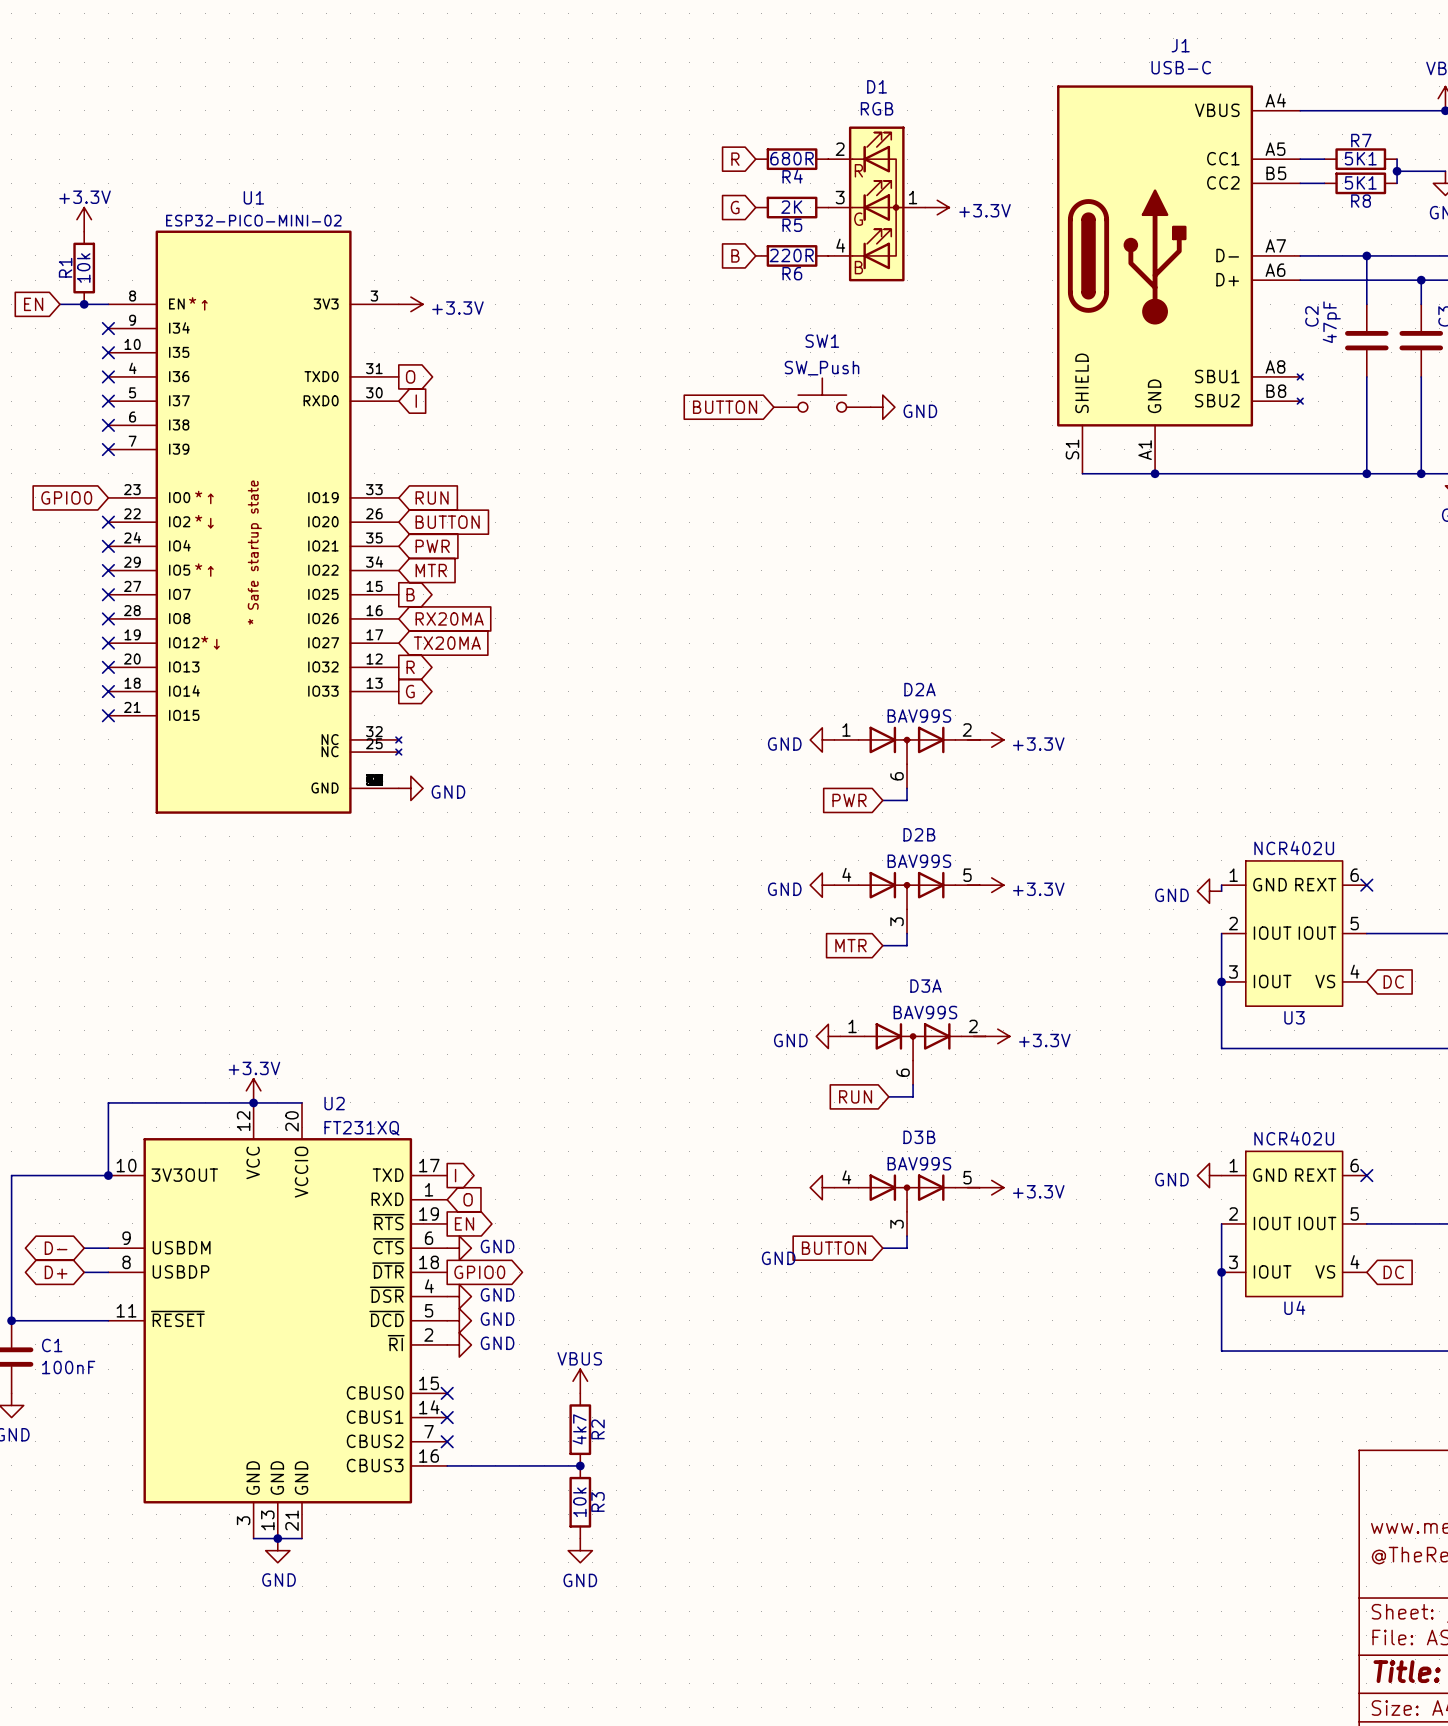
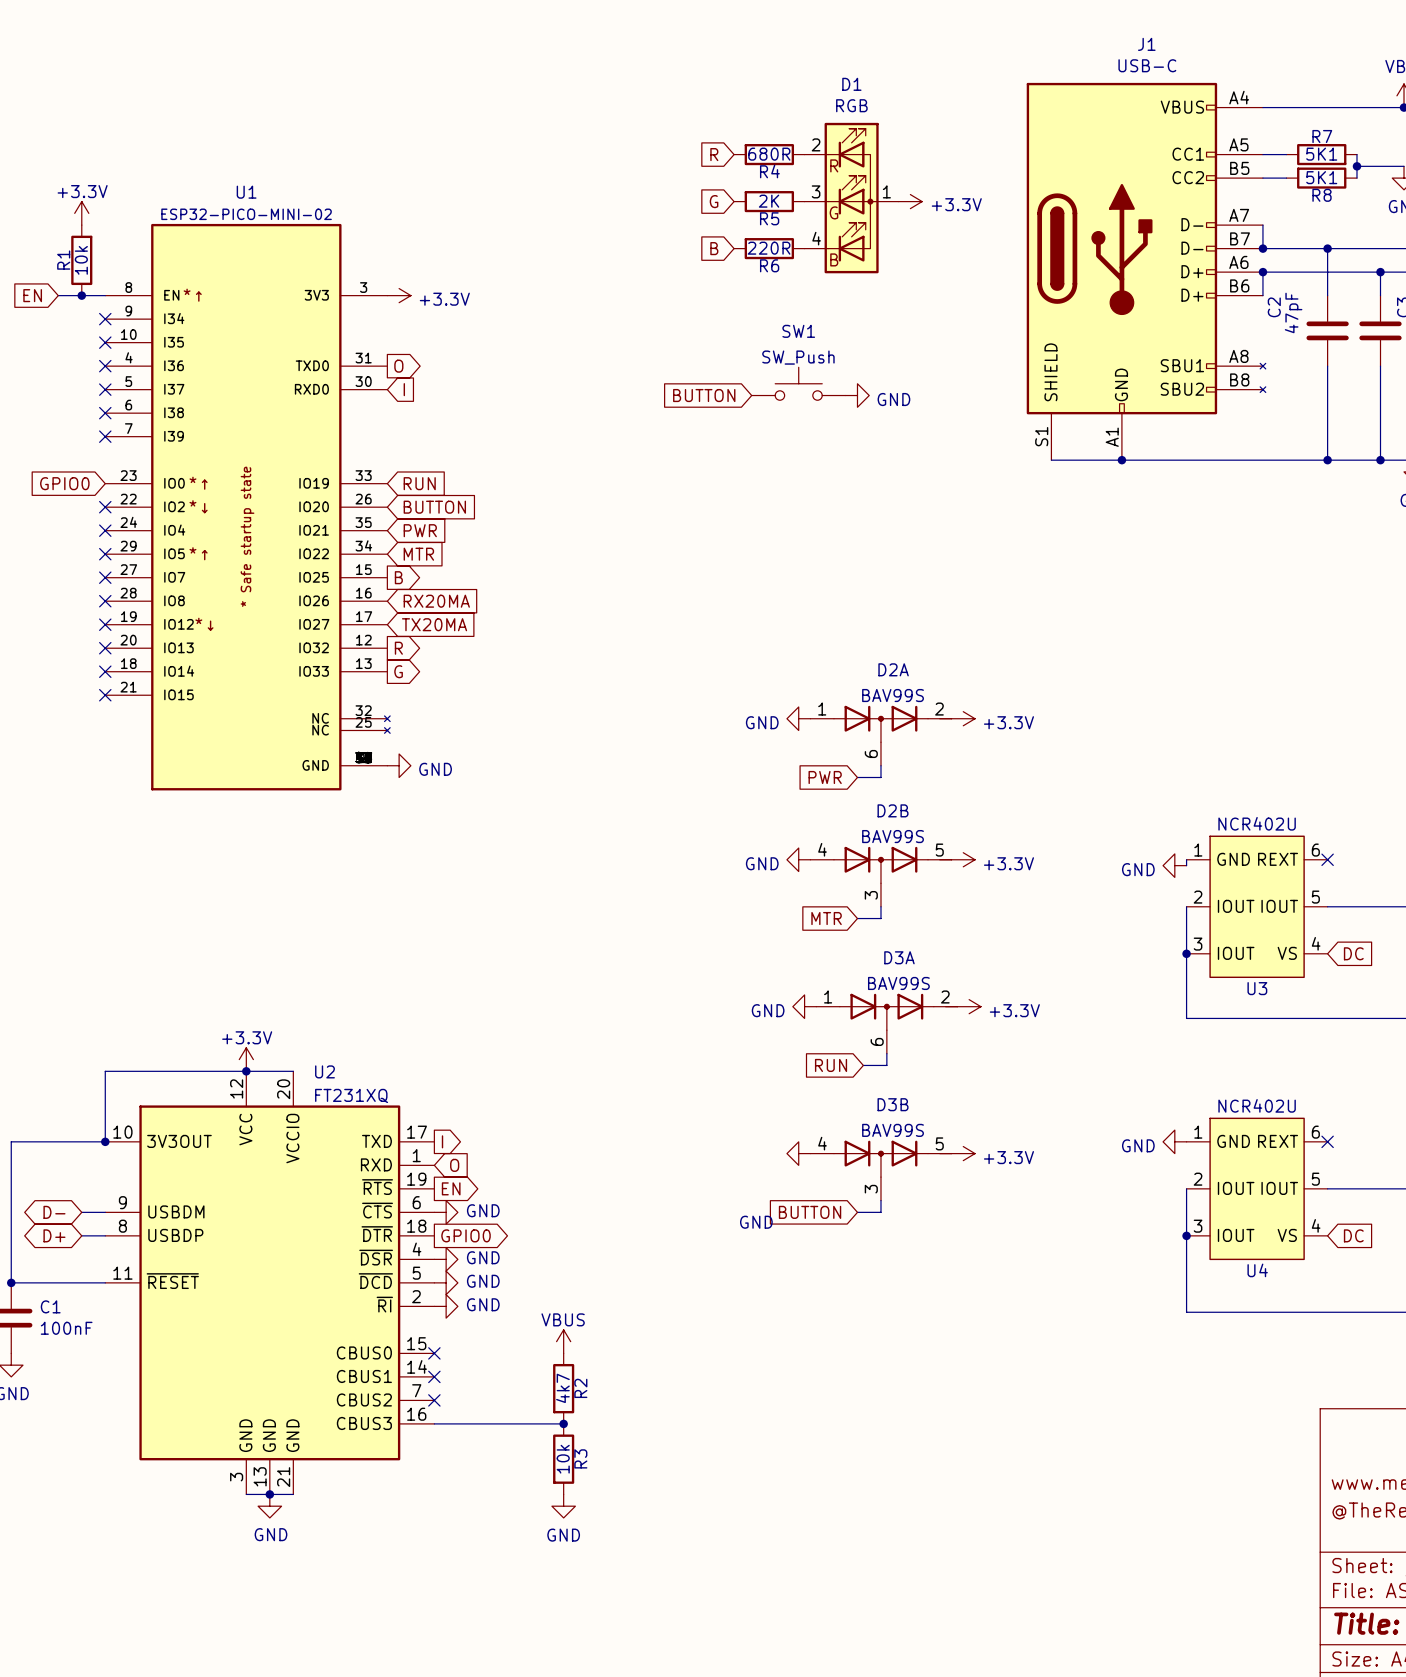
J1 symbol: [1057, 85, 1304, 474] -> [1026, 82, 1266, 461]
wire: none -> (1262, 225) (1262, 248)
junction: none -> (1262, 248)
wire: none -> (1262, 272) (1262, 295)
junction: none -> (1262, 272)

